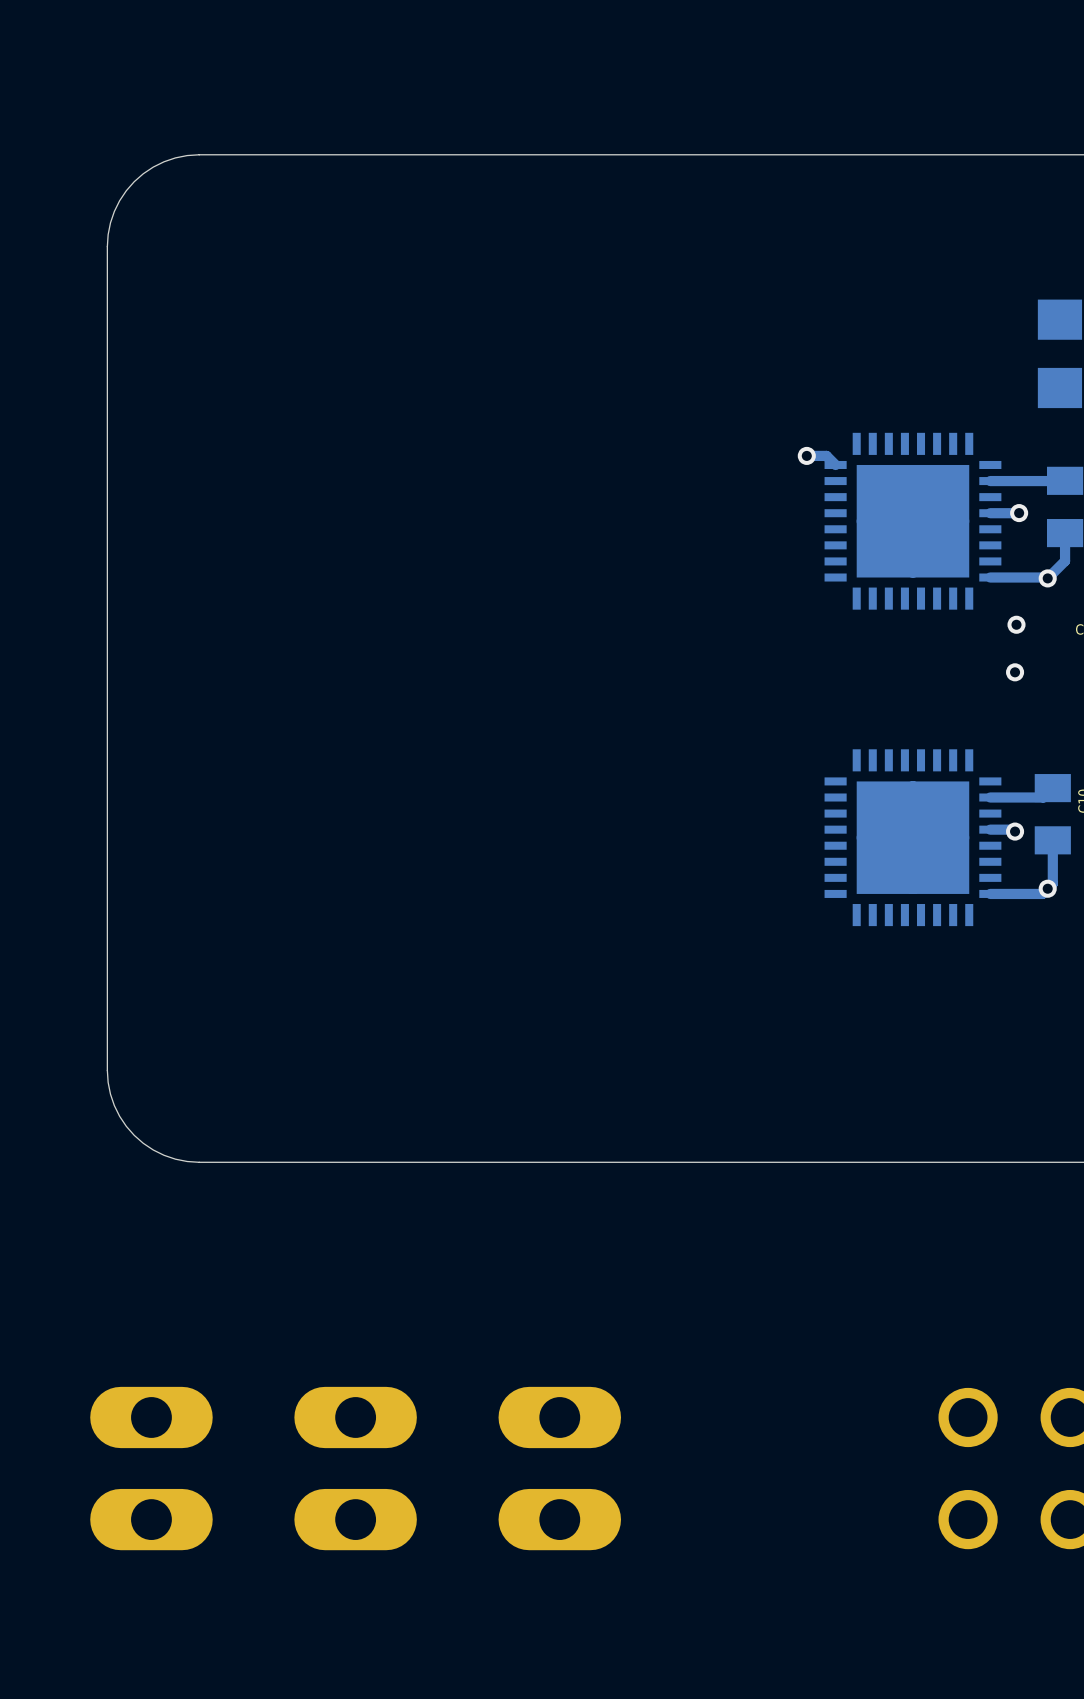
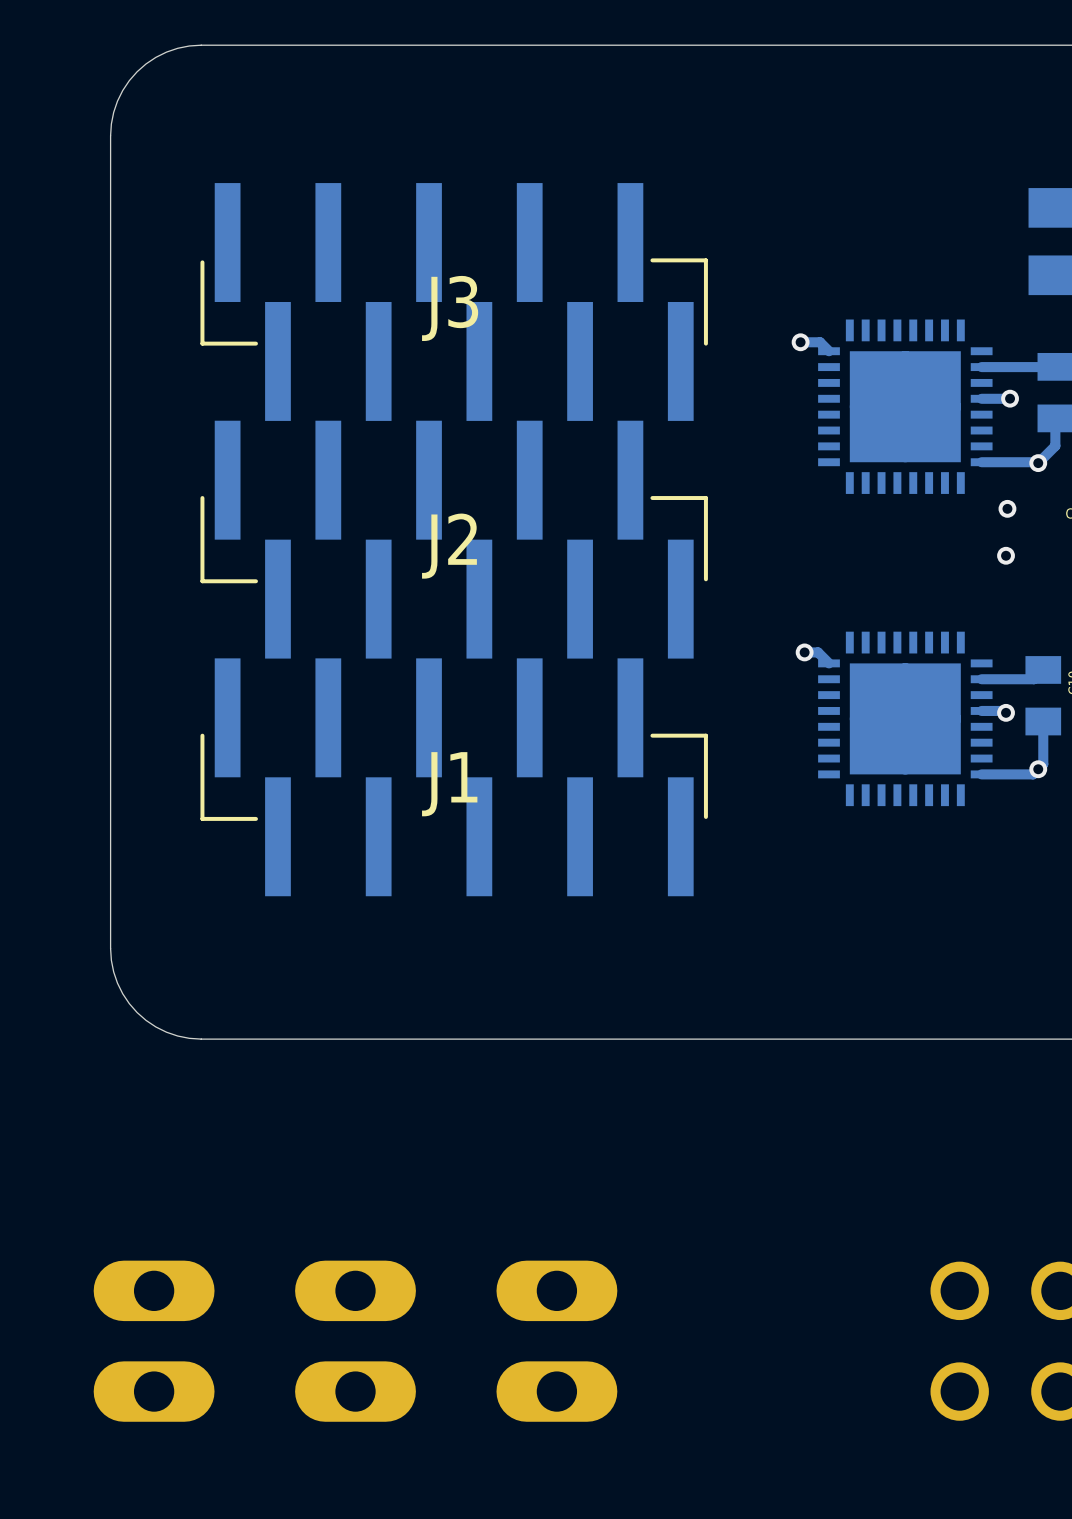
J3: none -> (454, 302)
J2: none -> (454, 539)
track: none -> (804, 652) (818, 652) (829, 663)
via: none -> (804, 652)
J1: none -> (454, 777)

